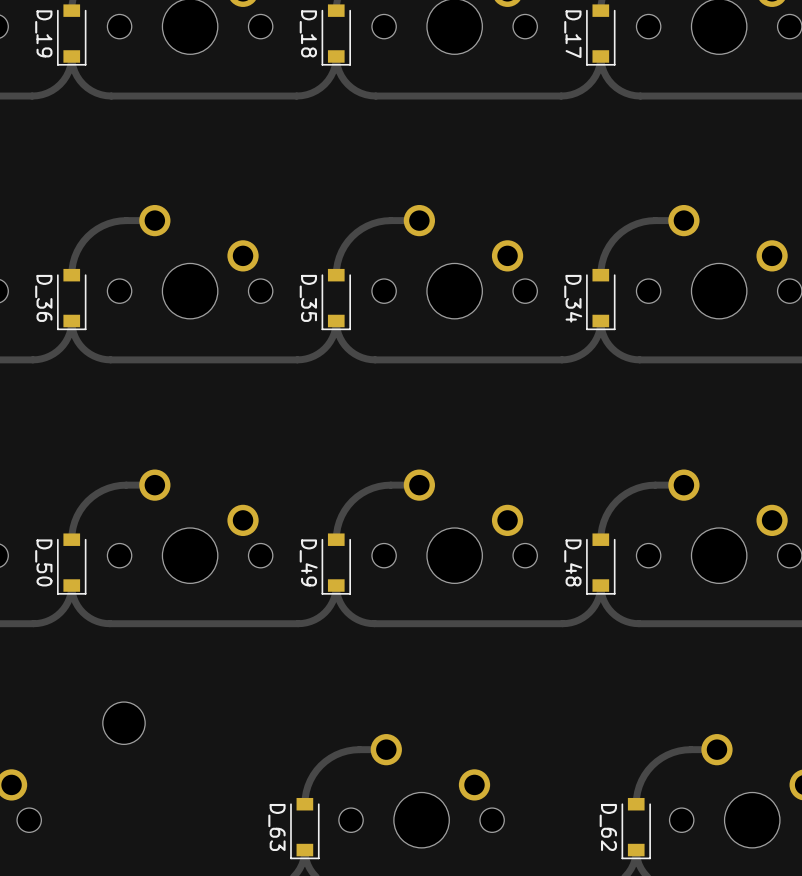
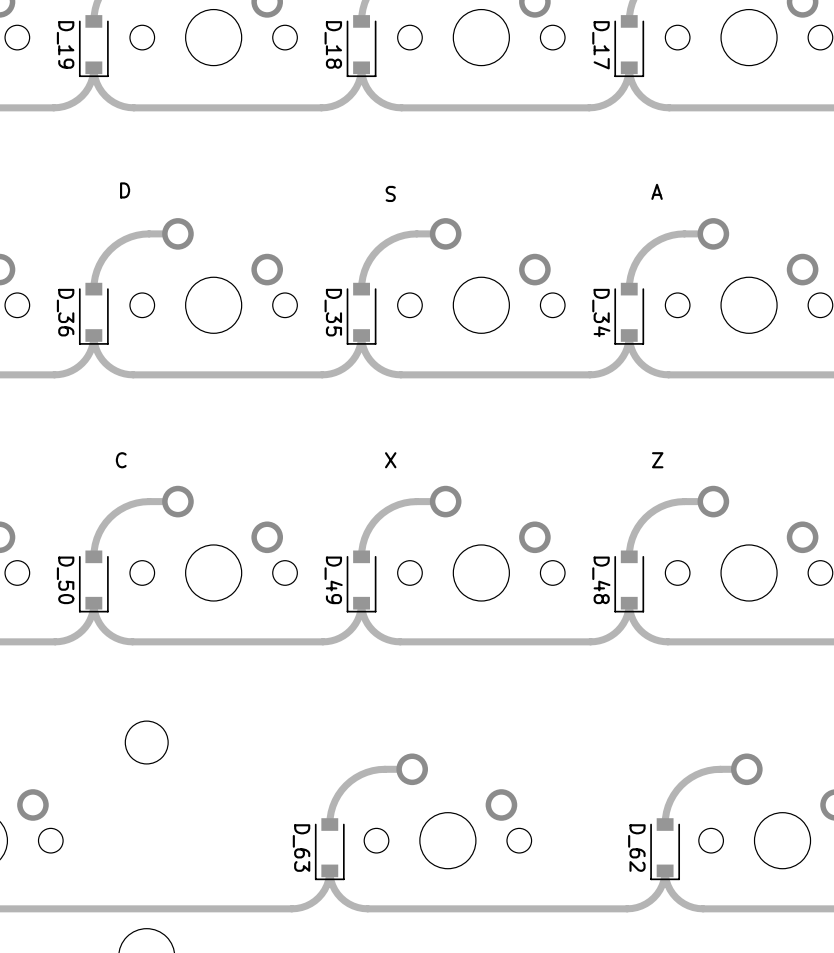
text: none -> D (125, 190)
text: none -> A (657, 191)
text: none -> S (390, 193)
text: none -> C (121, 460)
text: none -> X (390, 460)
text: none -> Z (657, 460)

